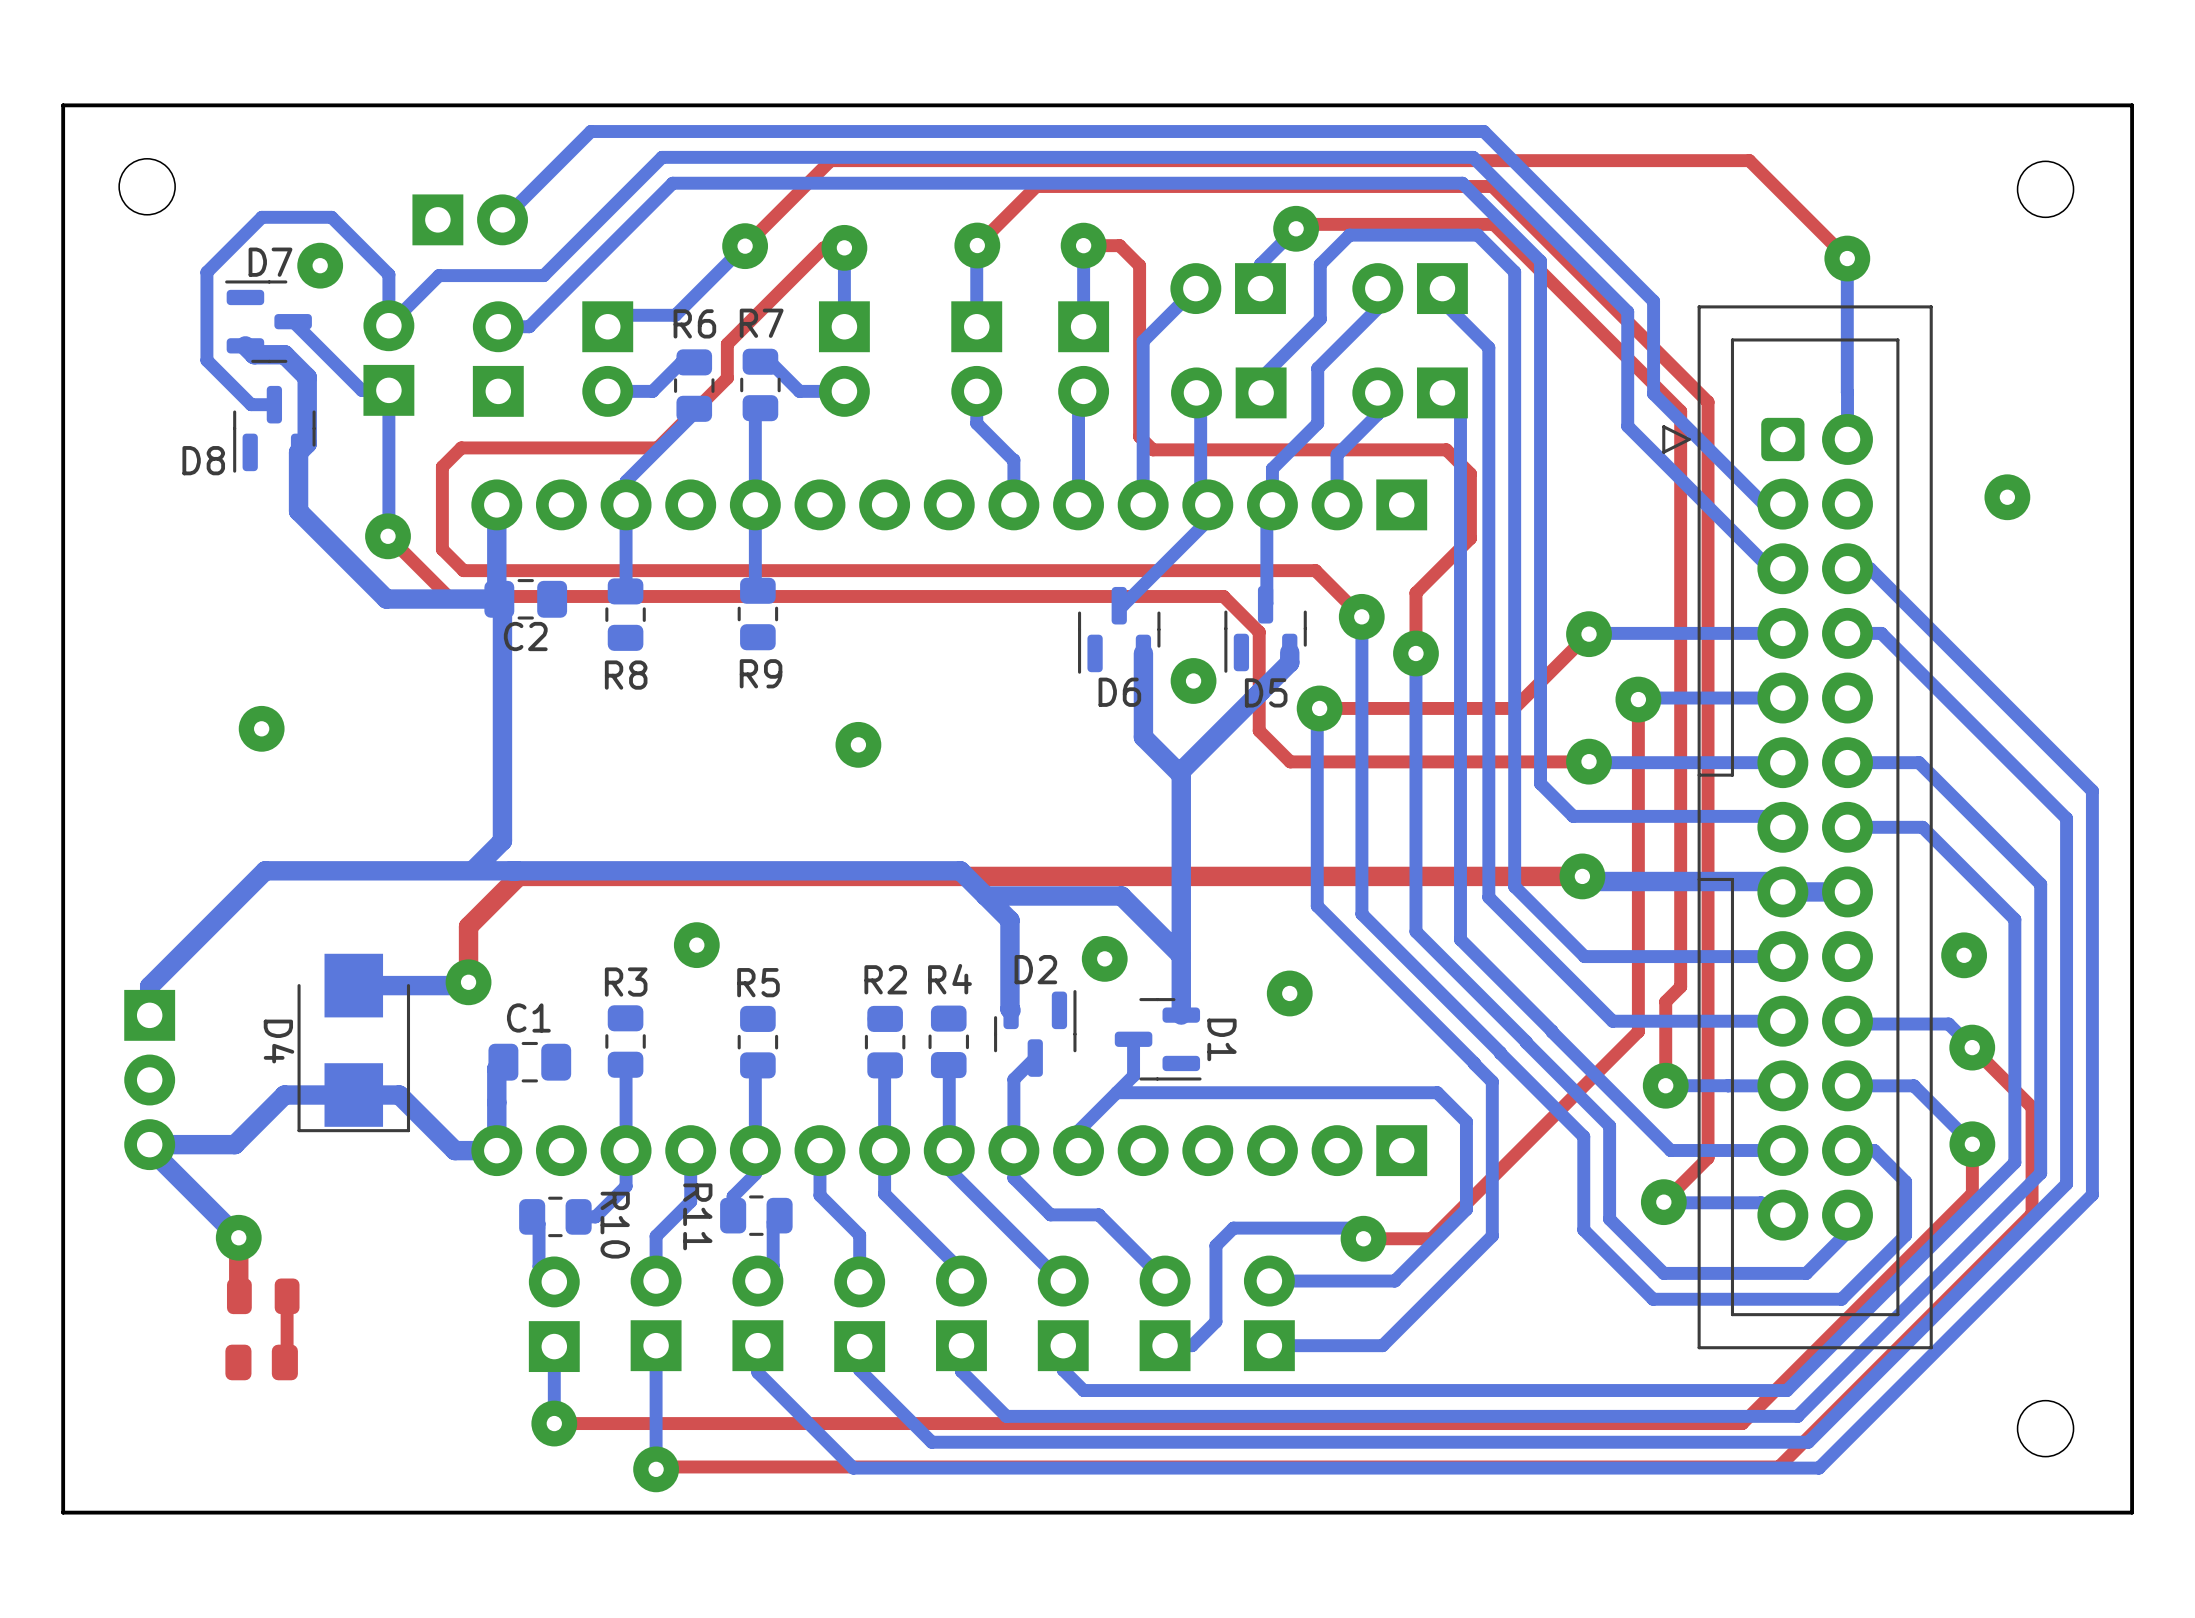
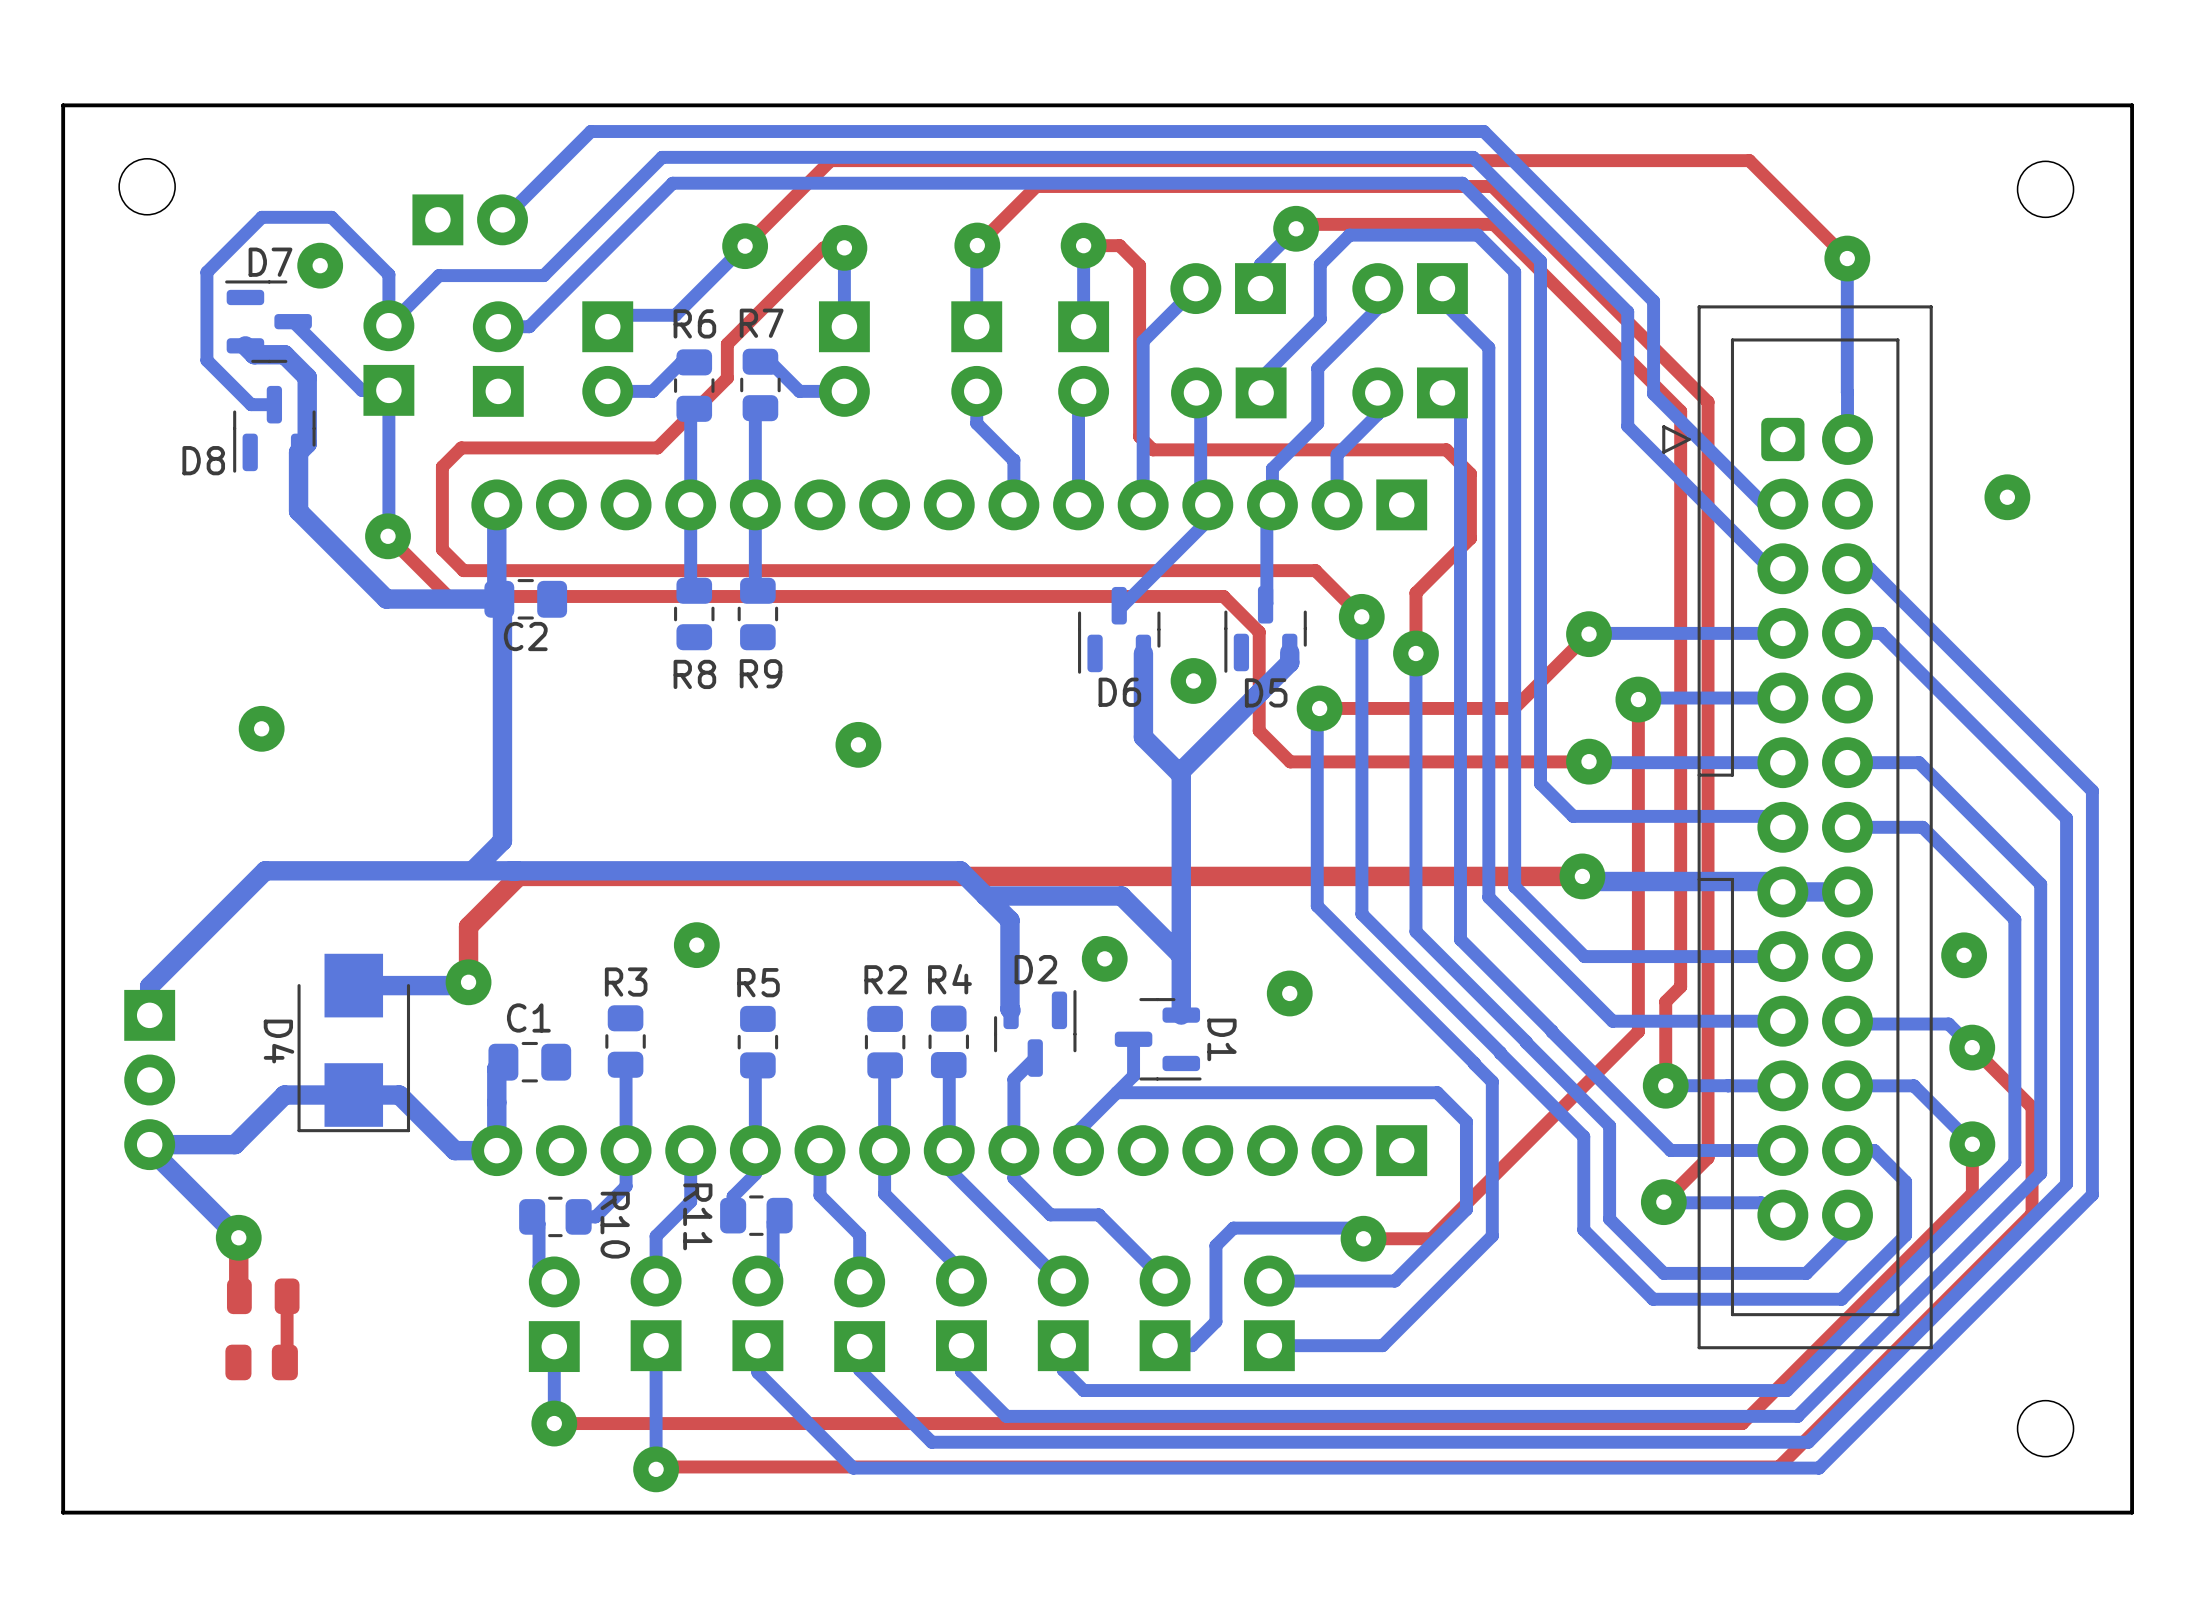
bottom track: (694, 408) (694, 413) (626, 481) (626, 586) (630, 591) -> (694, 408) (690, 412) (690, 587) (694, 590)
R8 position: (625, 614) -> (694, 613)

